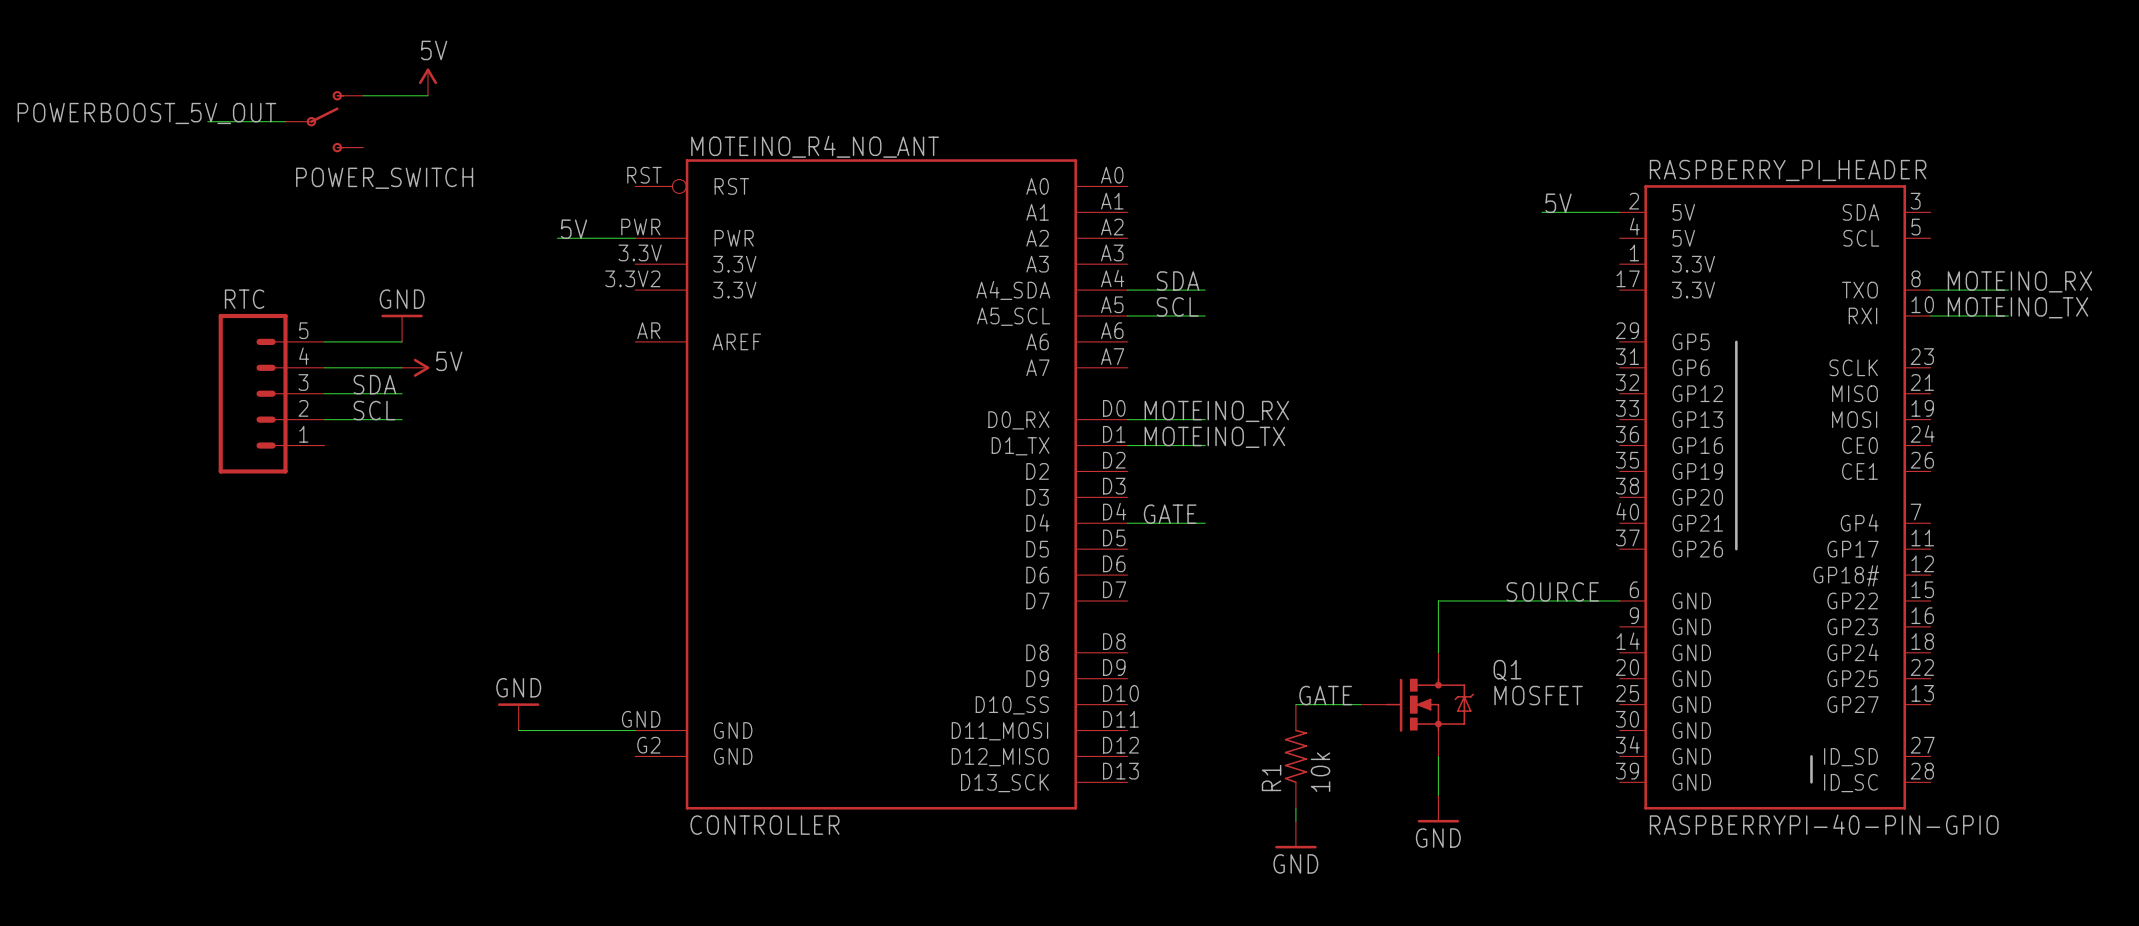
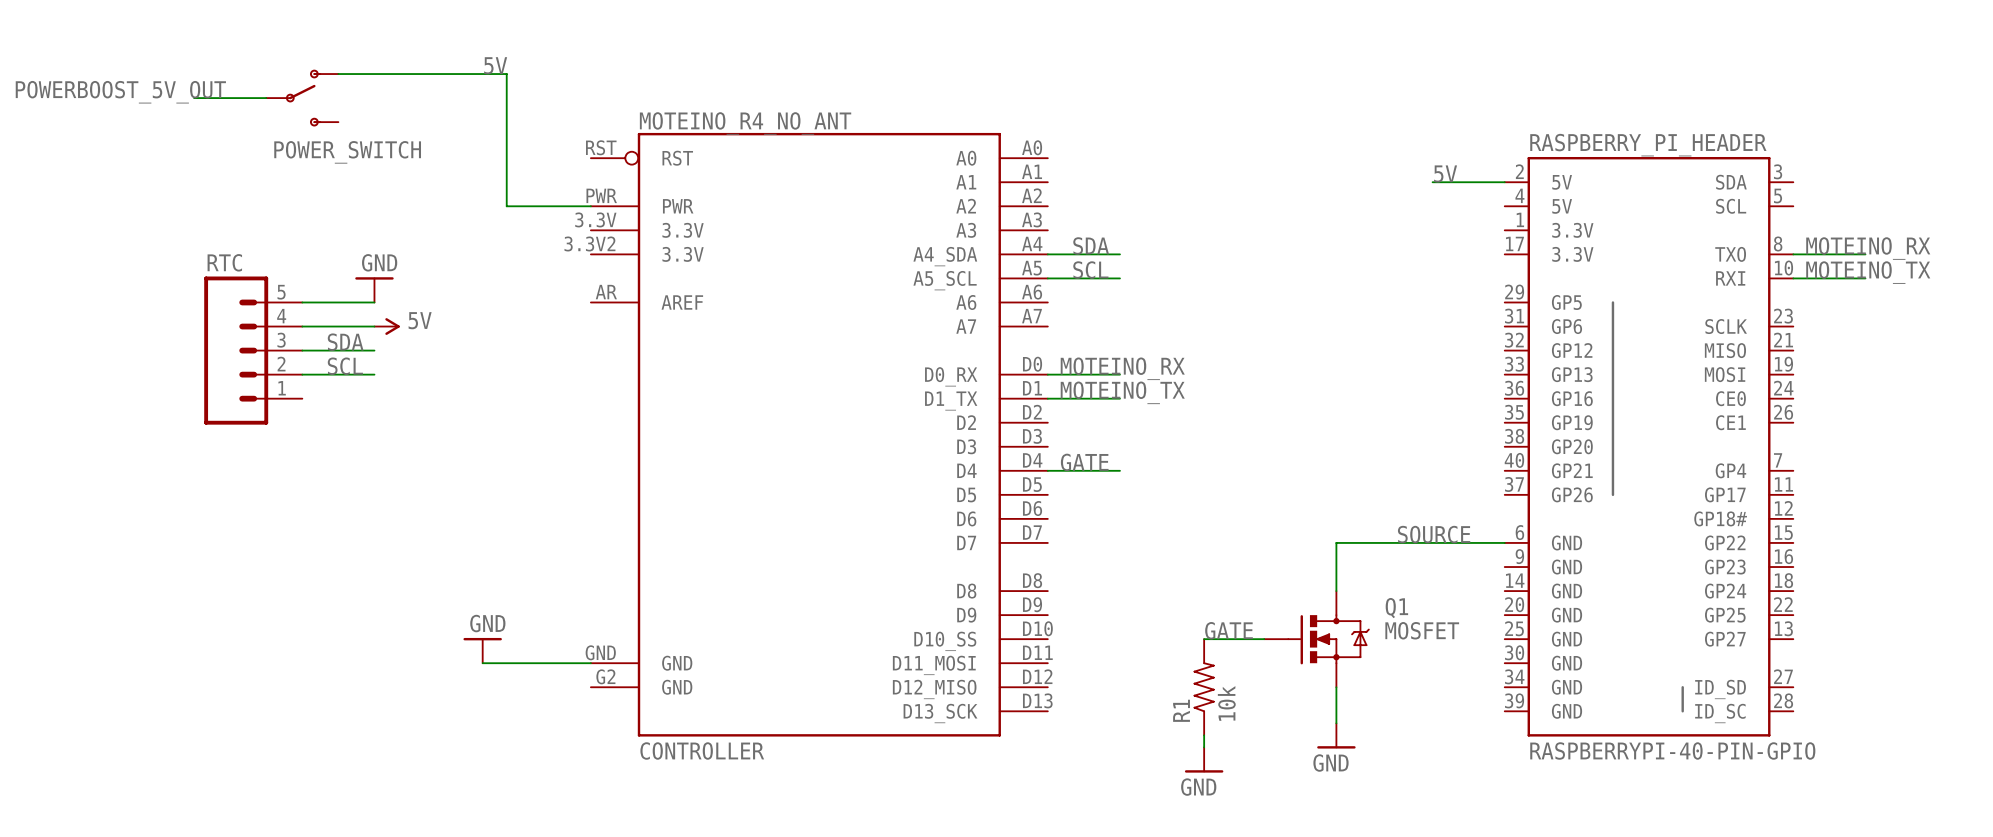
power symbol: 5V (427, 82) -> none
wire: none -> (398, 74) (506, 74) (506, 206) (518, 206)
label position: 5V (574, 229) -> 5V (495, 65)

